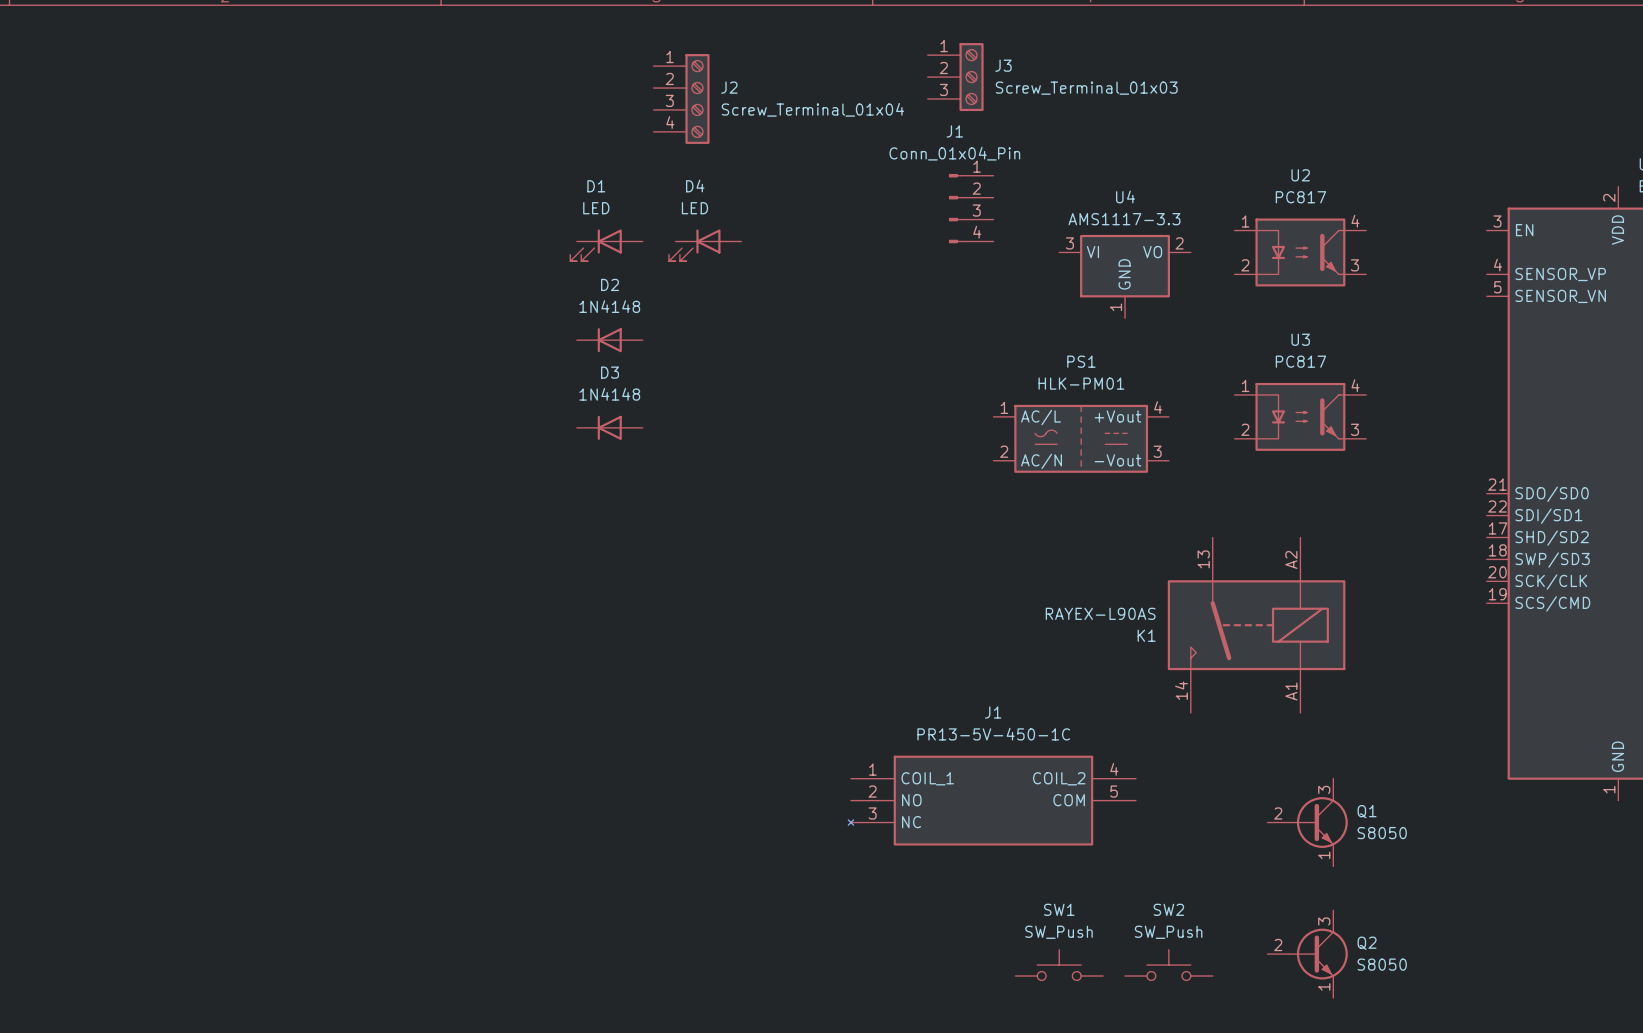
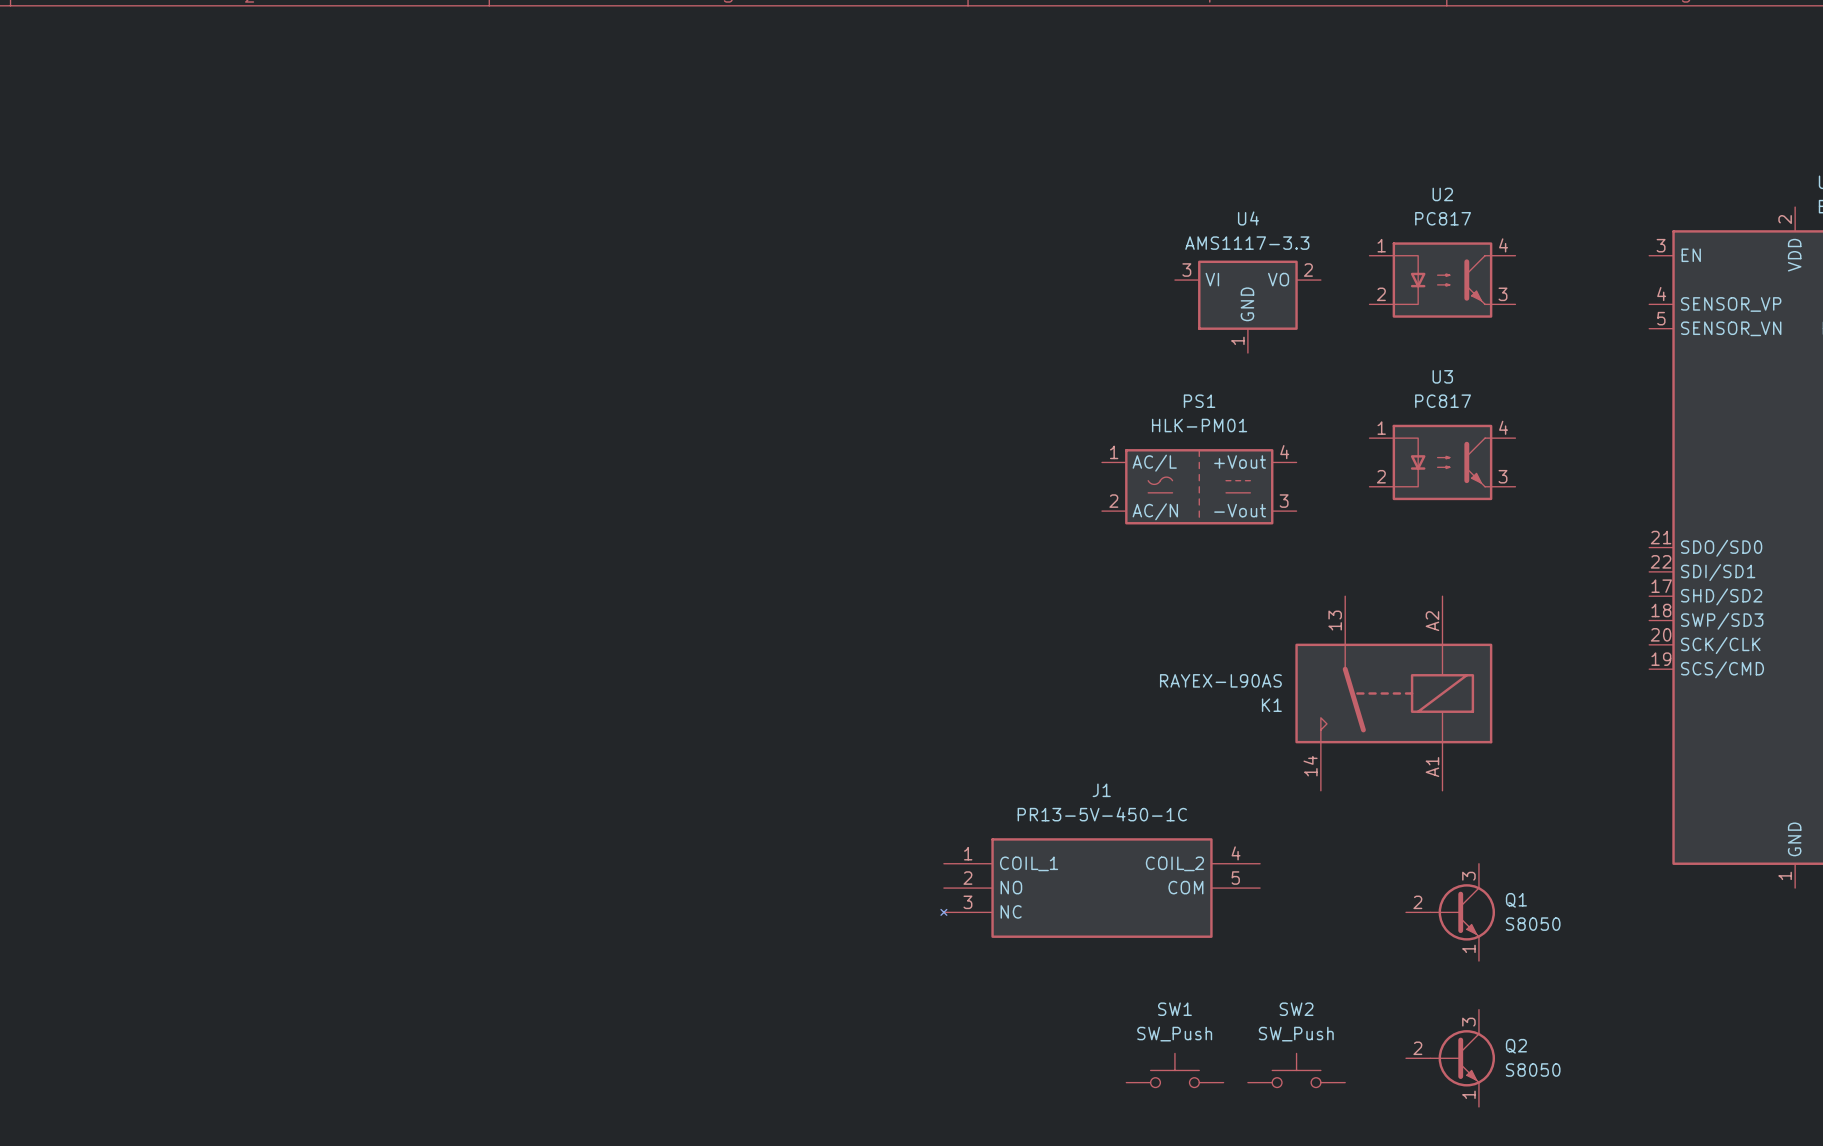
J3: Screw_Terminal_01x03 (955, 77) -> none
J2: Screw_Terminal_01x04 (681, 98) -> none
J1: Conn_01x04_Pin (971, 208) -> none
D1: LED (606, 245) -> none
D4: LED (705, 245) -> none
D2: 1N4148 (609, 340) -> none
D3: 1N4148 (609, 427) -> none

